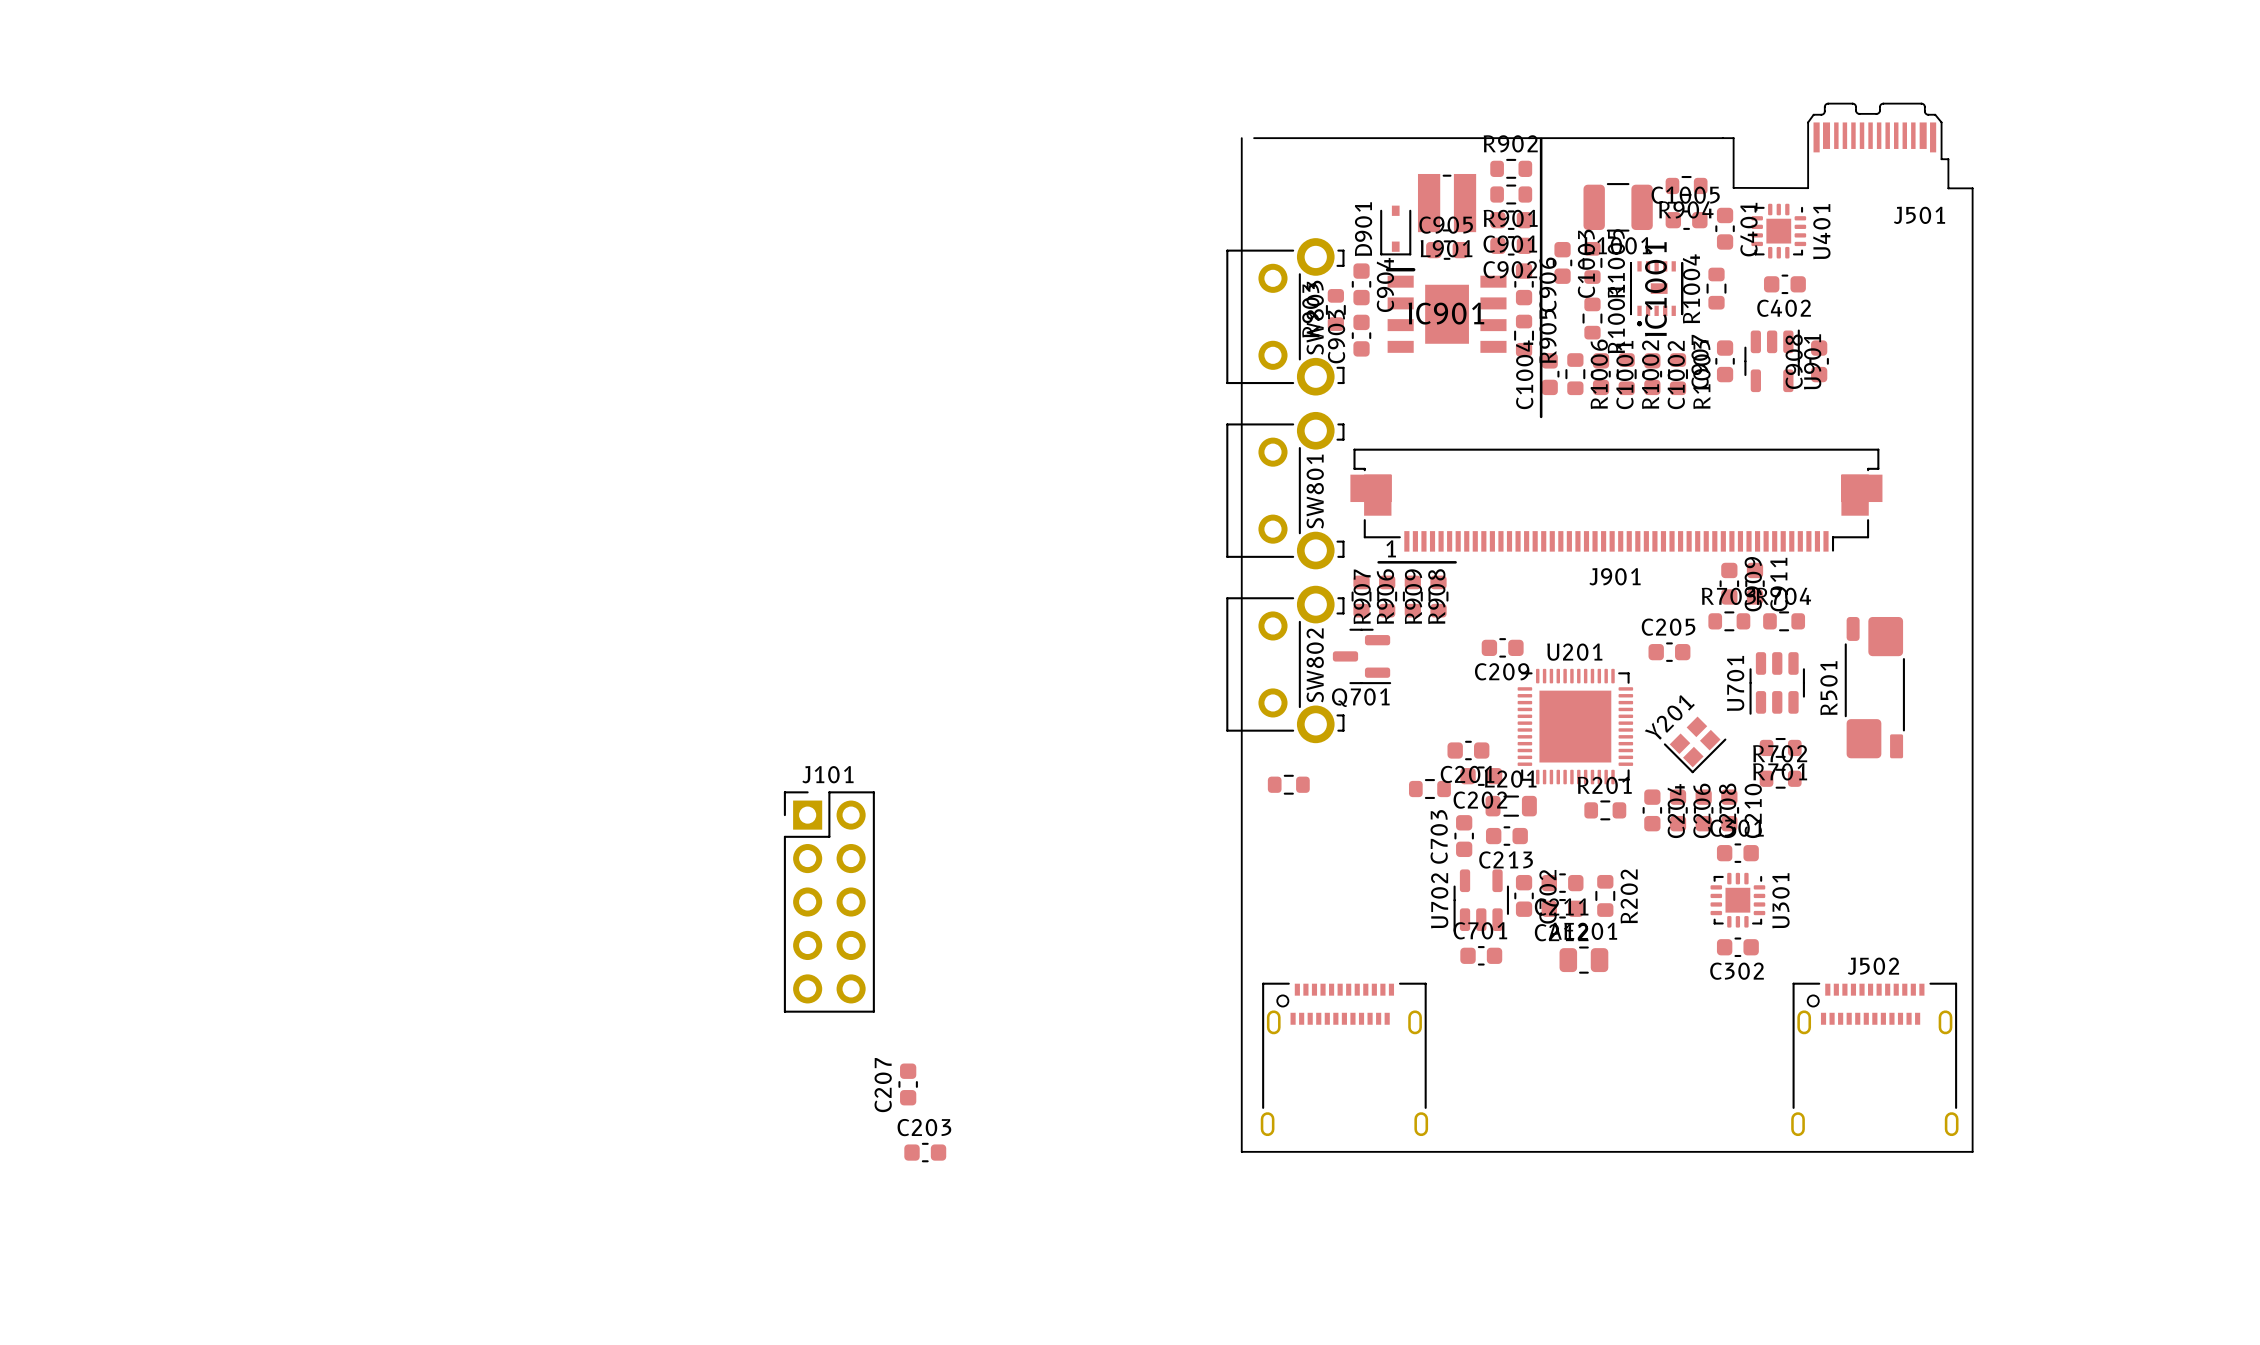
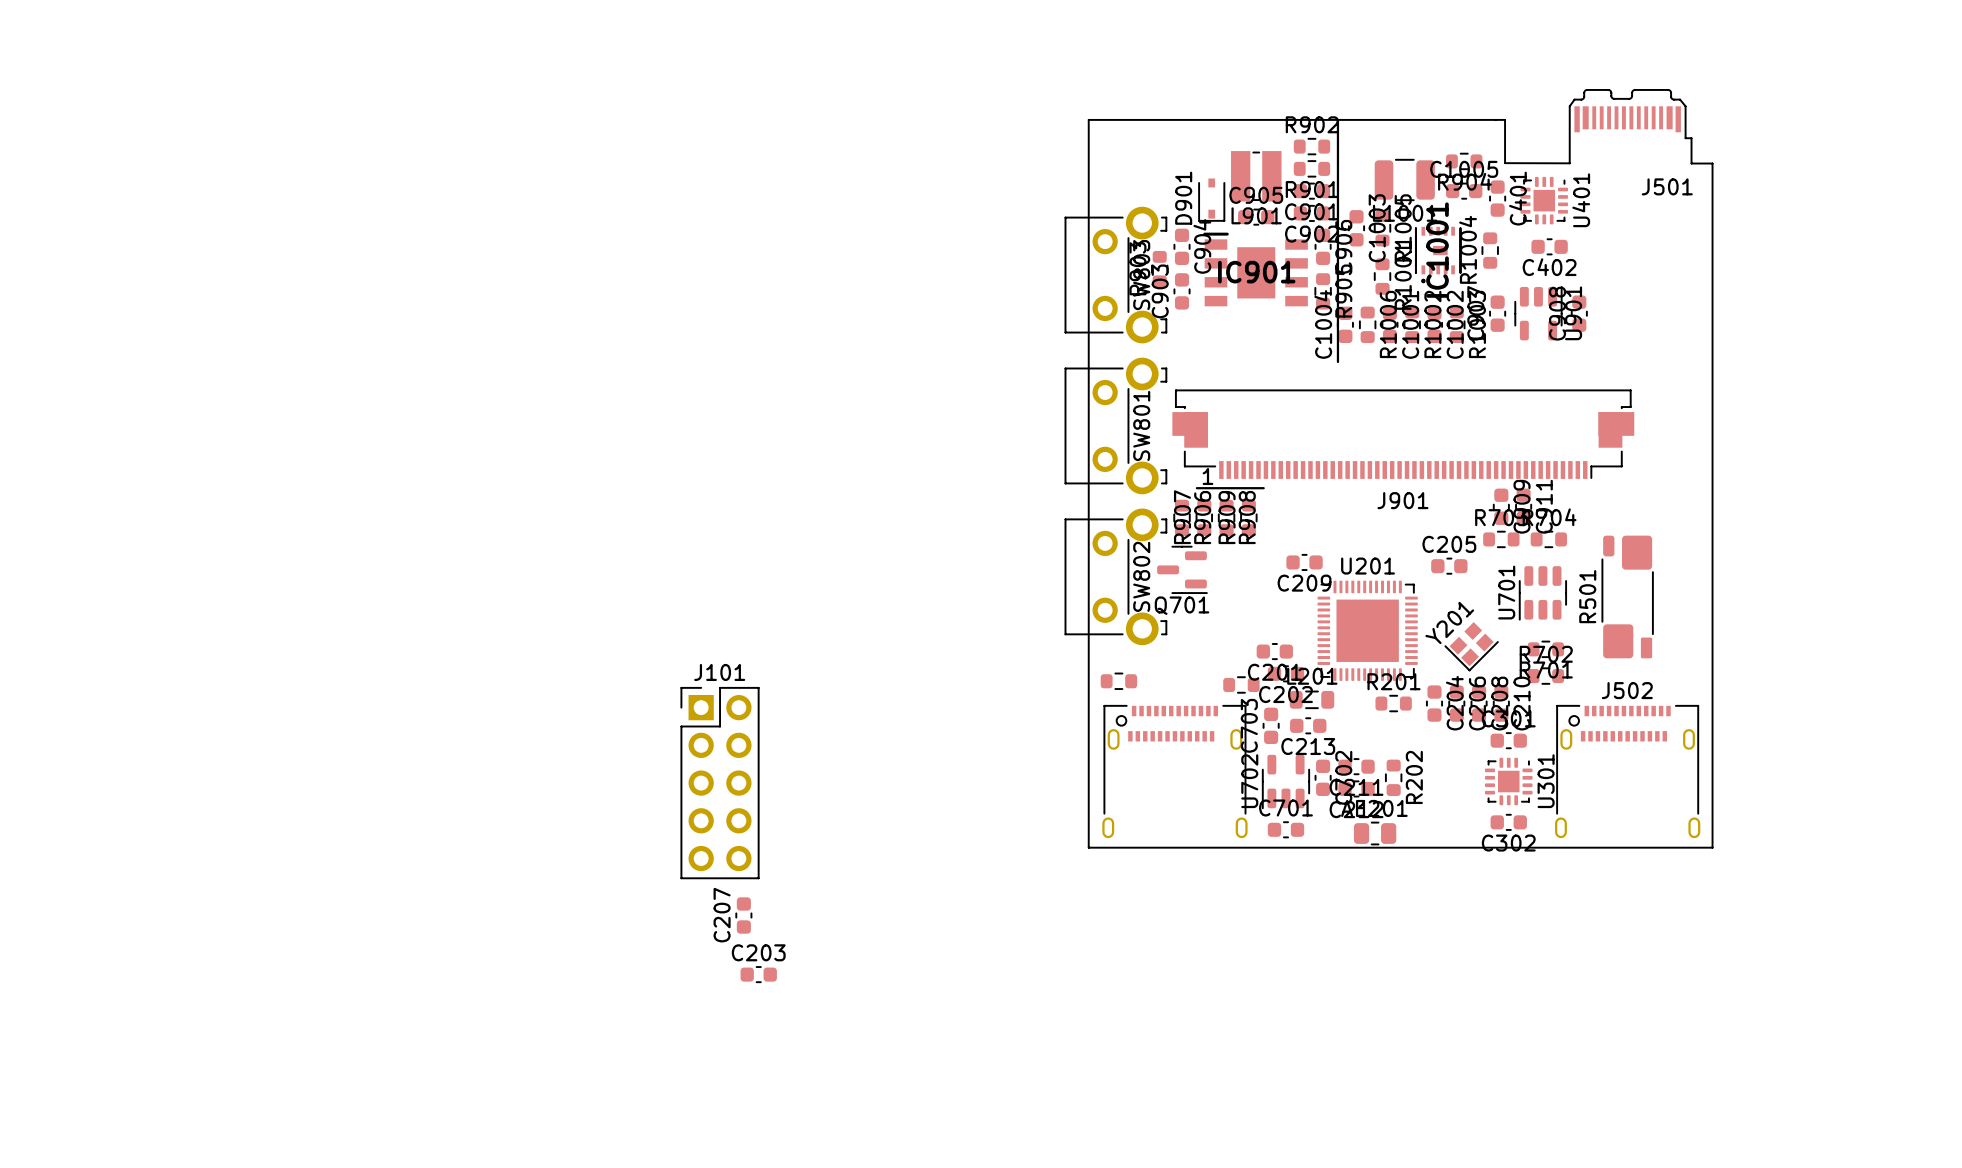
board edge: (1241, 138) (1241, 1151) (1972, 1151) (1972, 976) -> (1088, 119) (1088, 847) (1712, 847)
part position: (1344, 1059) -> (1174, 771)
J502 position: (1874, 1059) -> (1627, 771)
C207 position: (908, 1084) -> (743, 915)
C203 position: (925, 1152) -> (758, 974)

